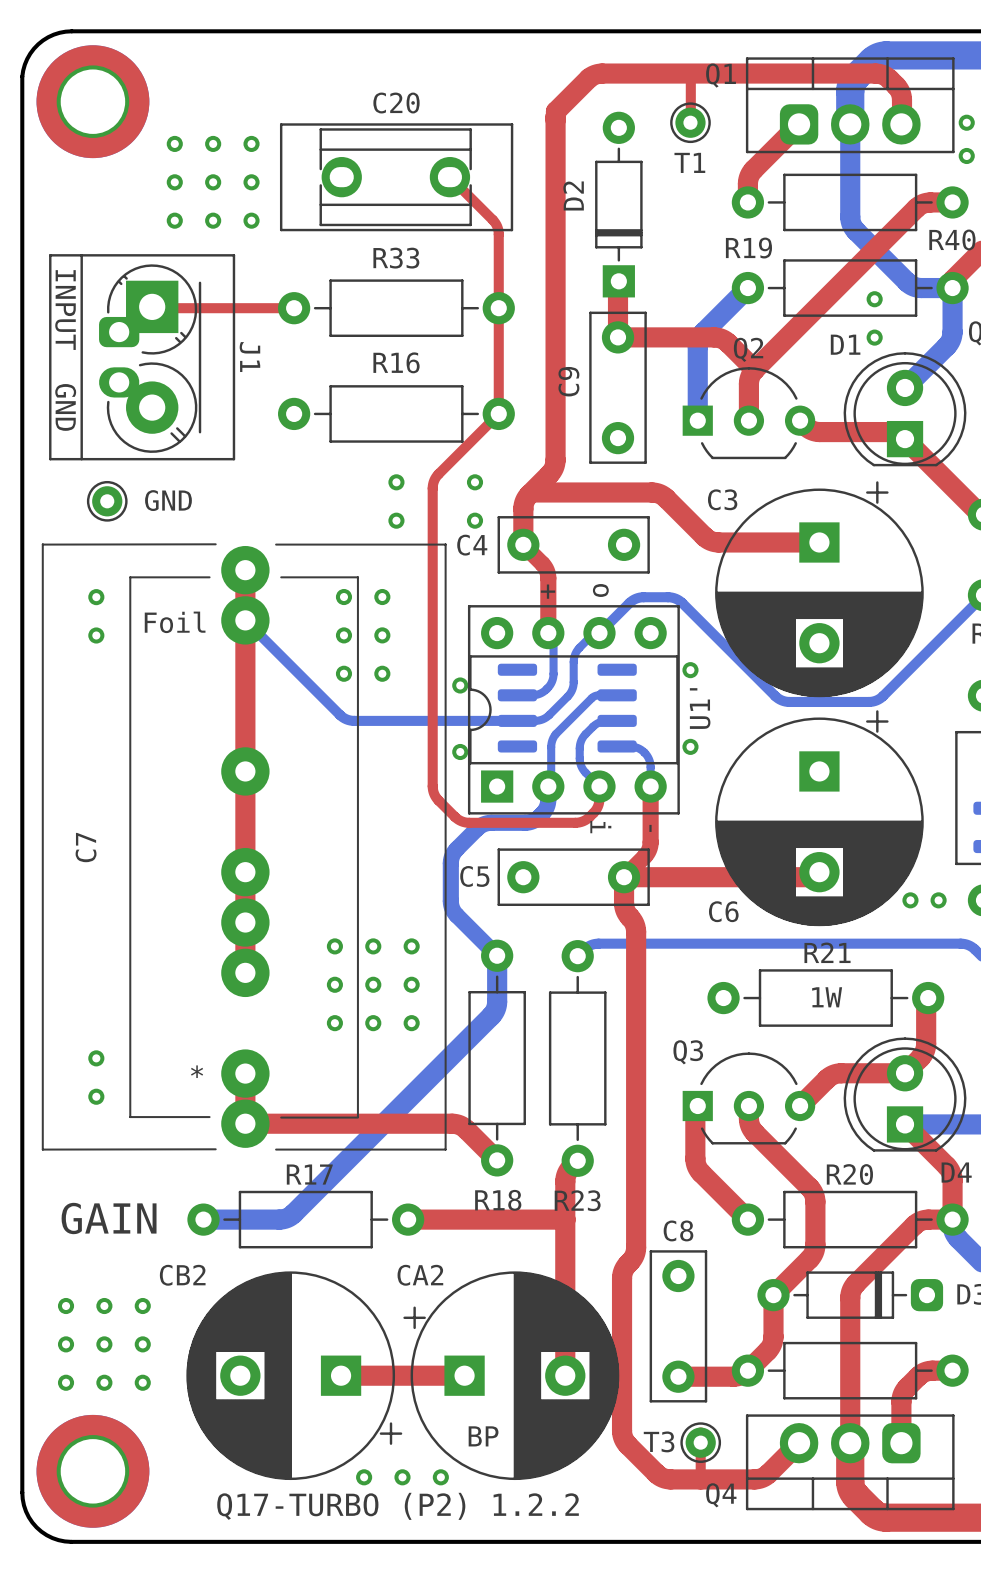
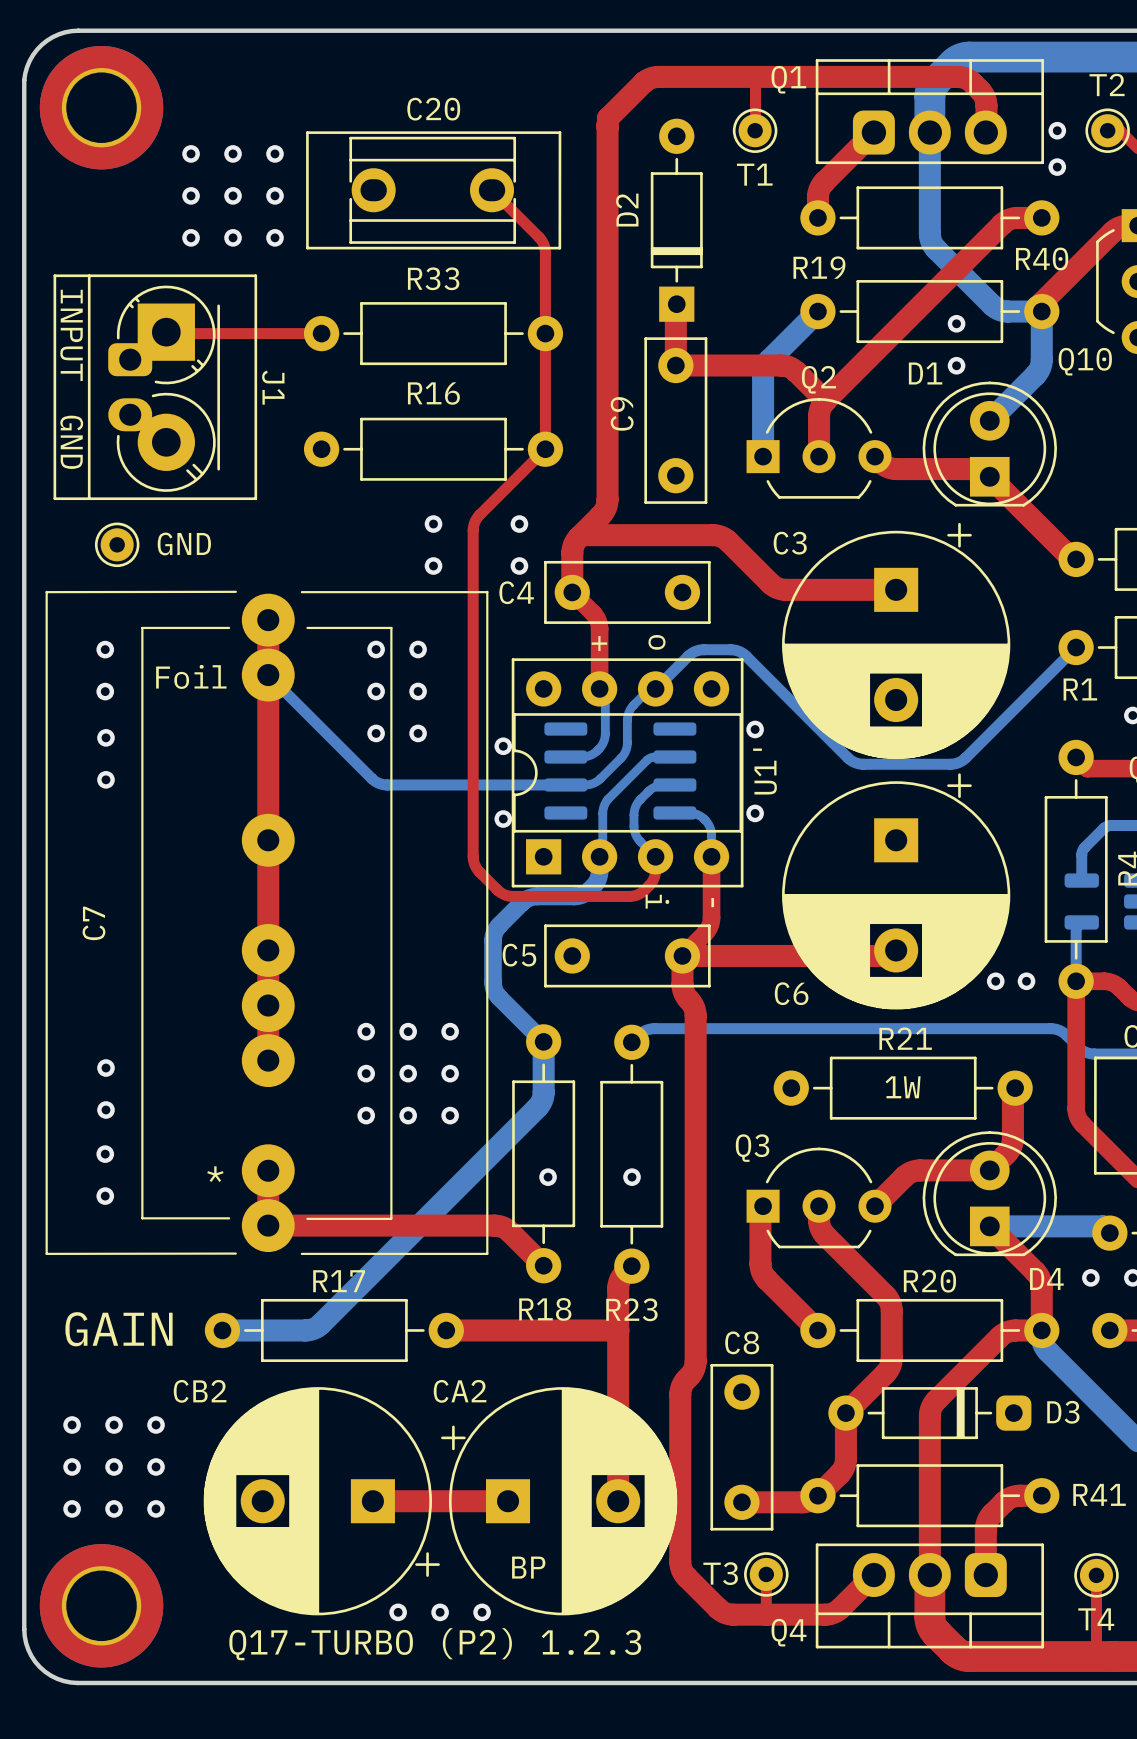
via: none -> (105, 737)
via: none -> (105, 779)
via: none -> (105, 1068)
via: none -> (105, 1110)
via: none -> (548, 1177)
via: none -> (632, 1177)
text: Q17-TURBO (P2) 1.2.2 (398, 1506) -> Q17-TURBO (P2) 1.2.3 (435, 1644)

